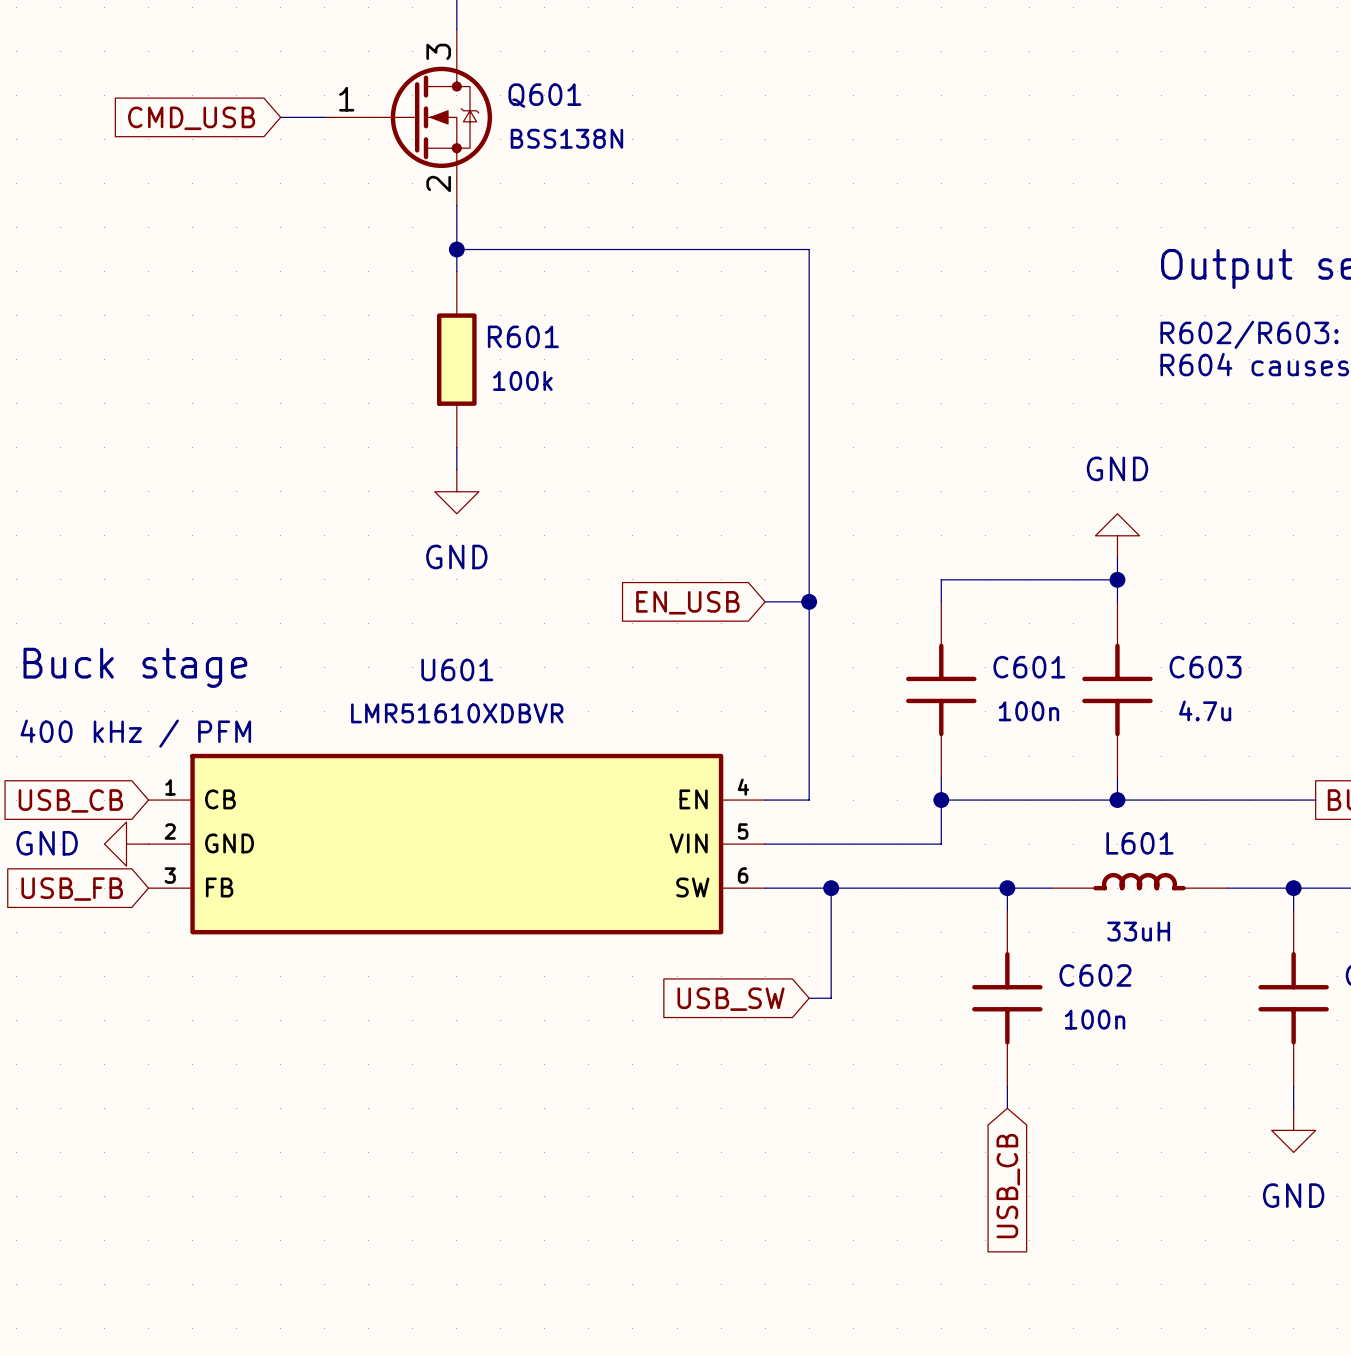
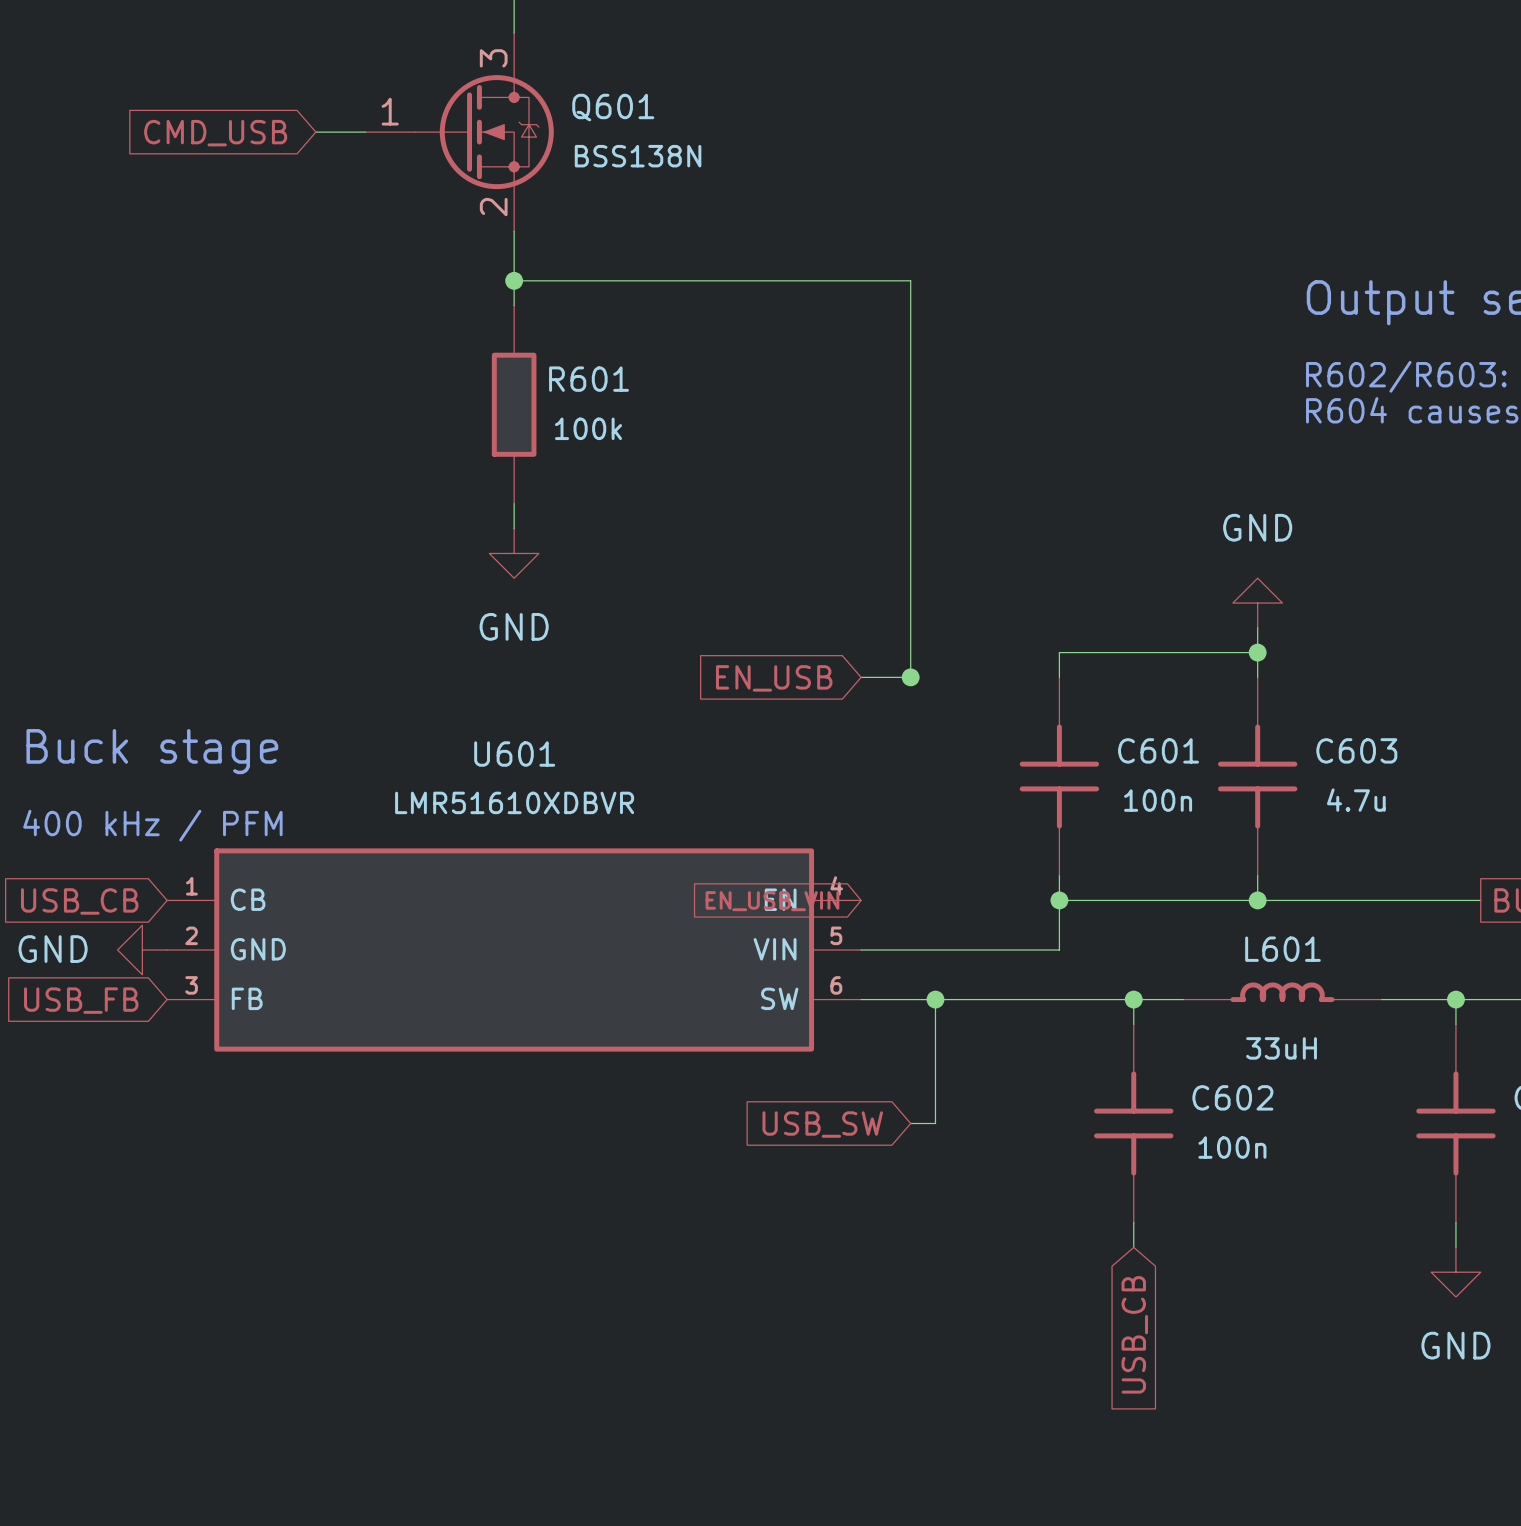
wire: (809, 601) (809, 800) (765, 800) -> none
global label: none -> EN_USB_VIN (772, 901)

